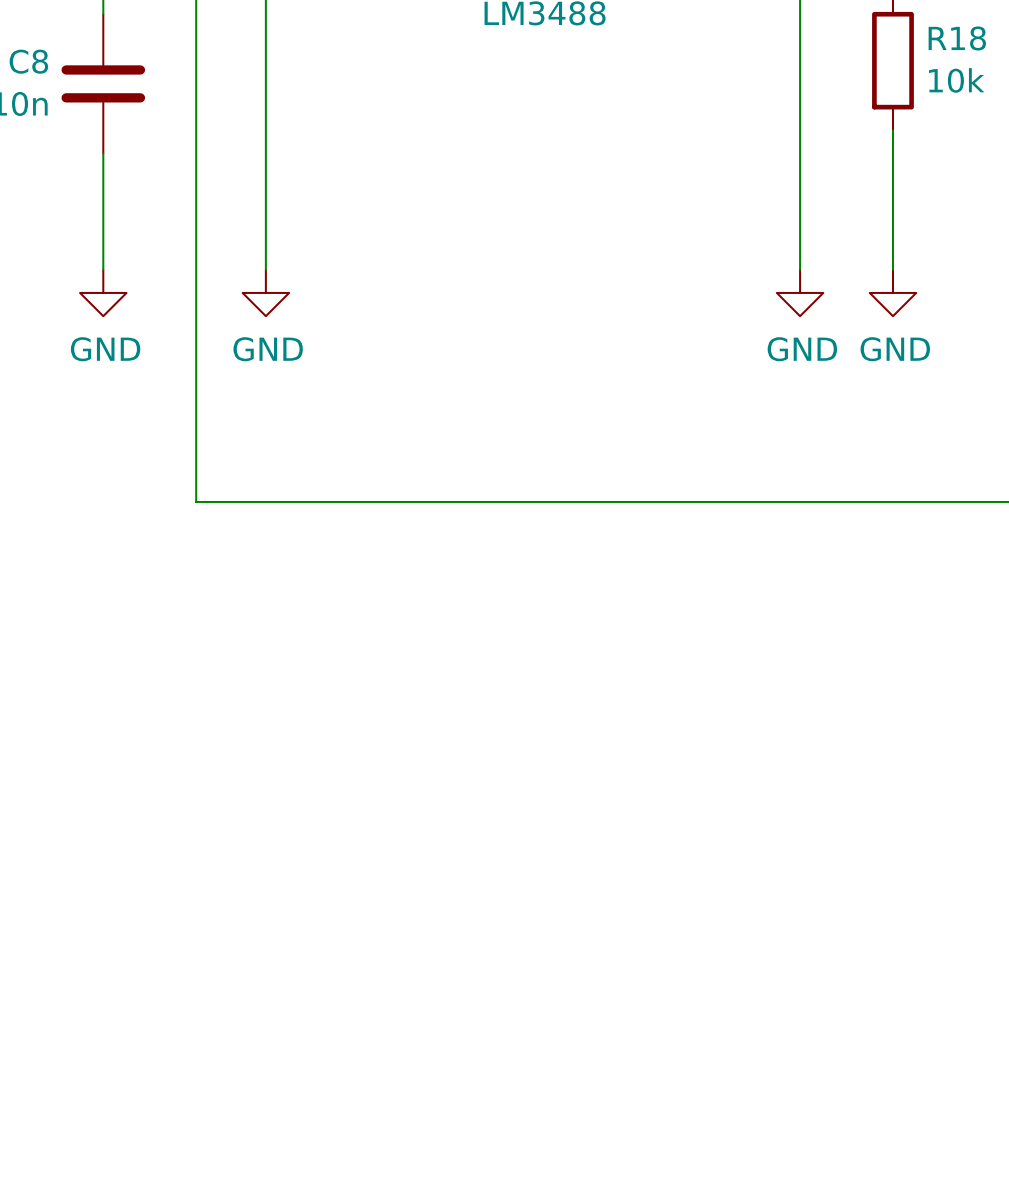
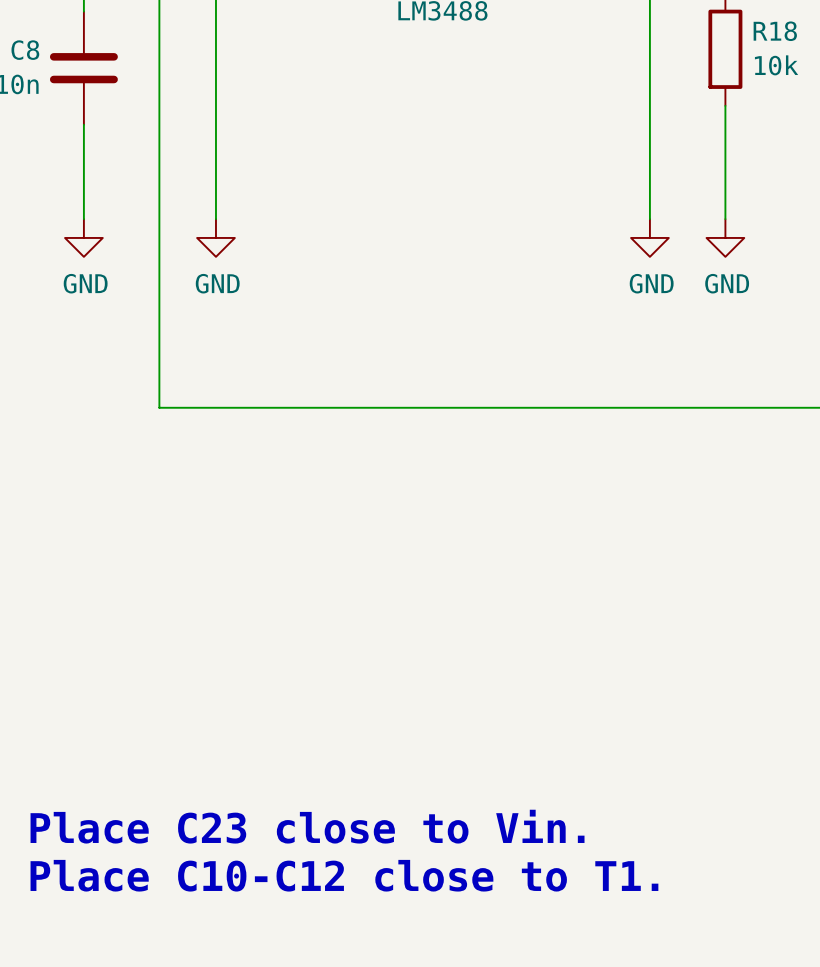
text: none -> Place C23 close to Vin. (307, 826)
text: none -> Place C10-C12 close to T1. (344, 875)

